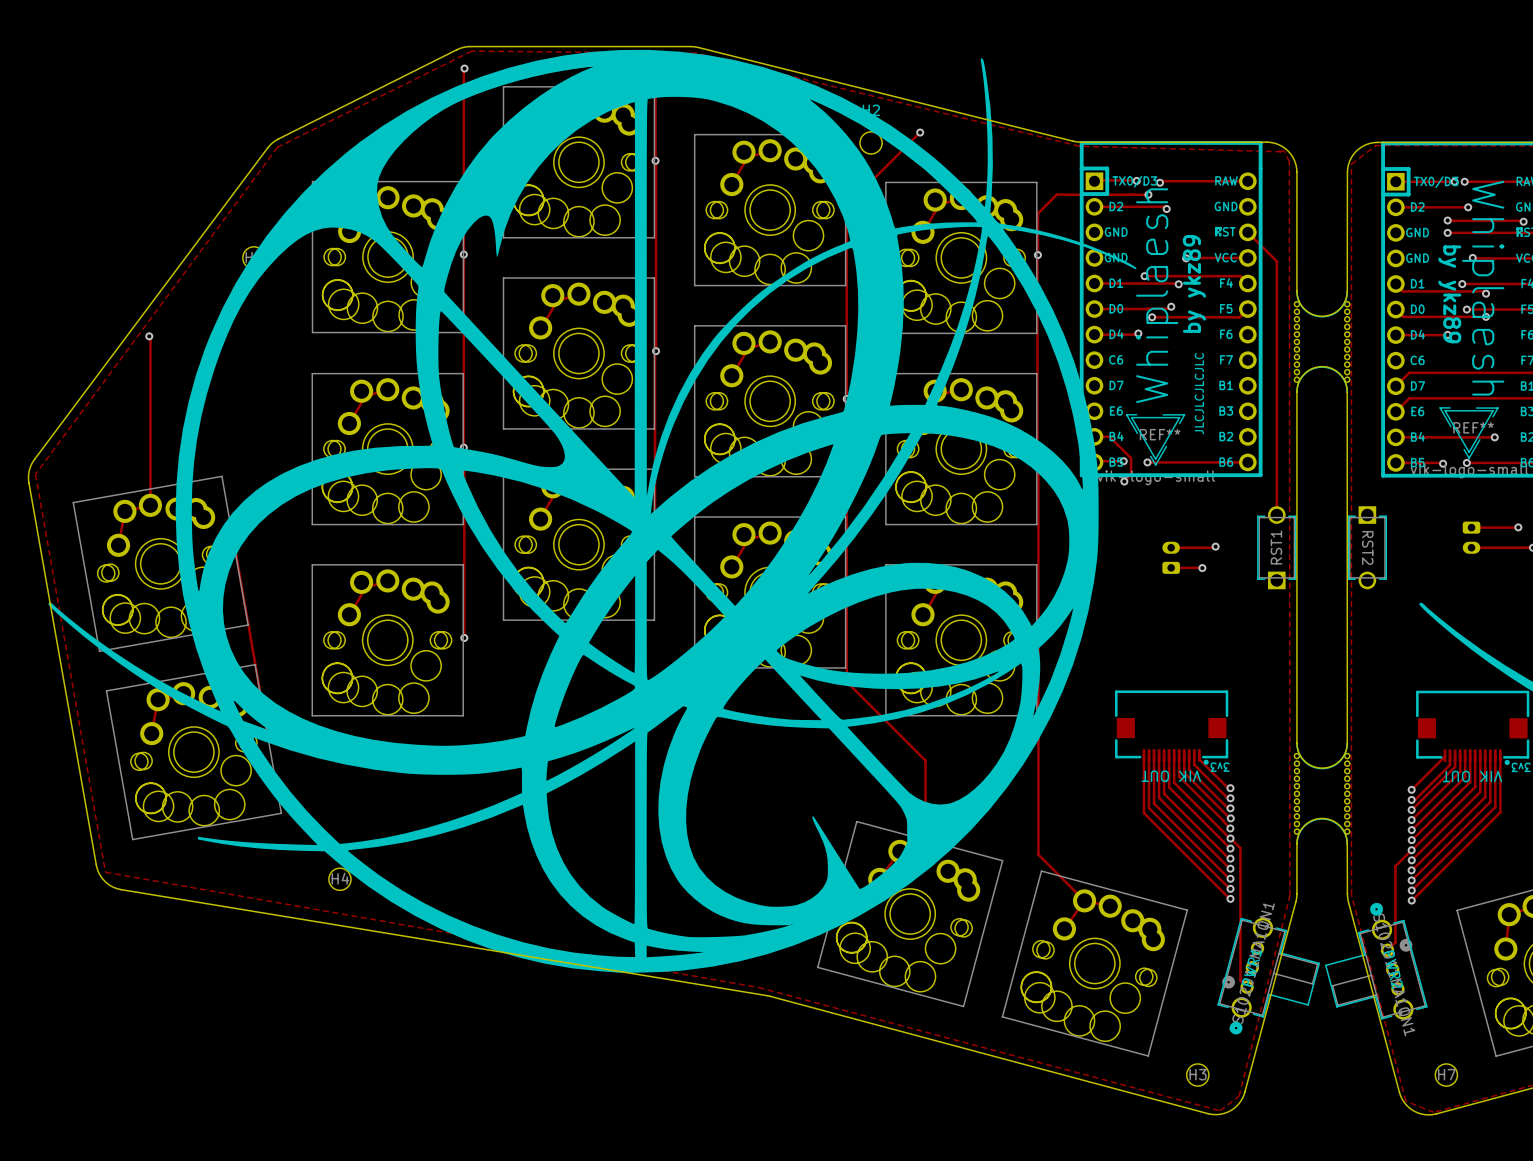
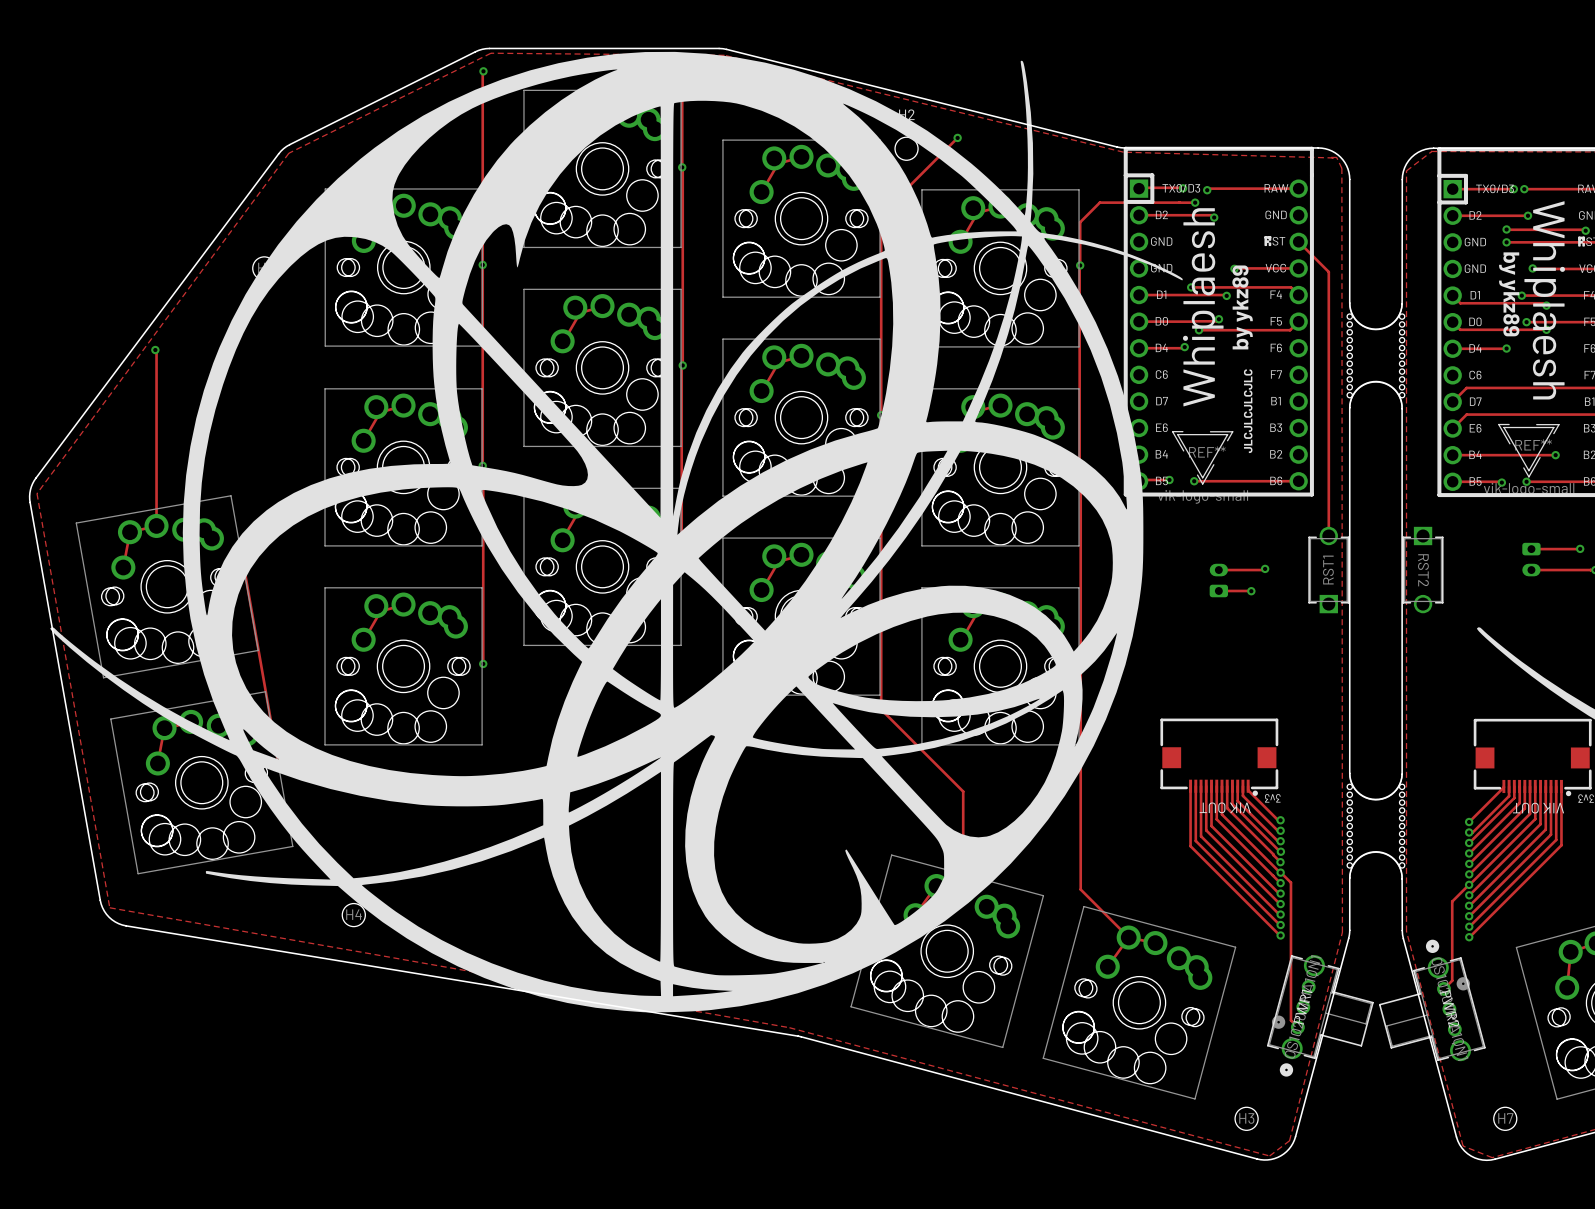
track: (1094, 436) (1109, 436) (1131, 458) (1131, 474) (1124, 481) -> none
via: (1124, 481) -> none

